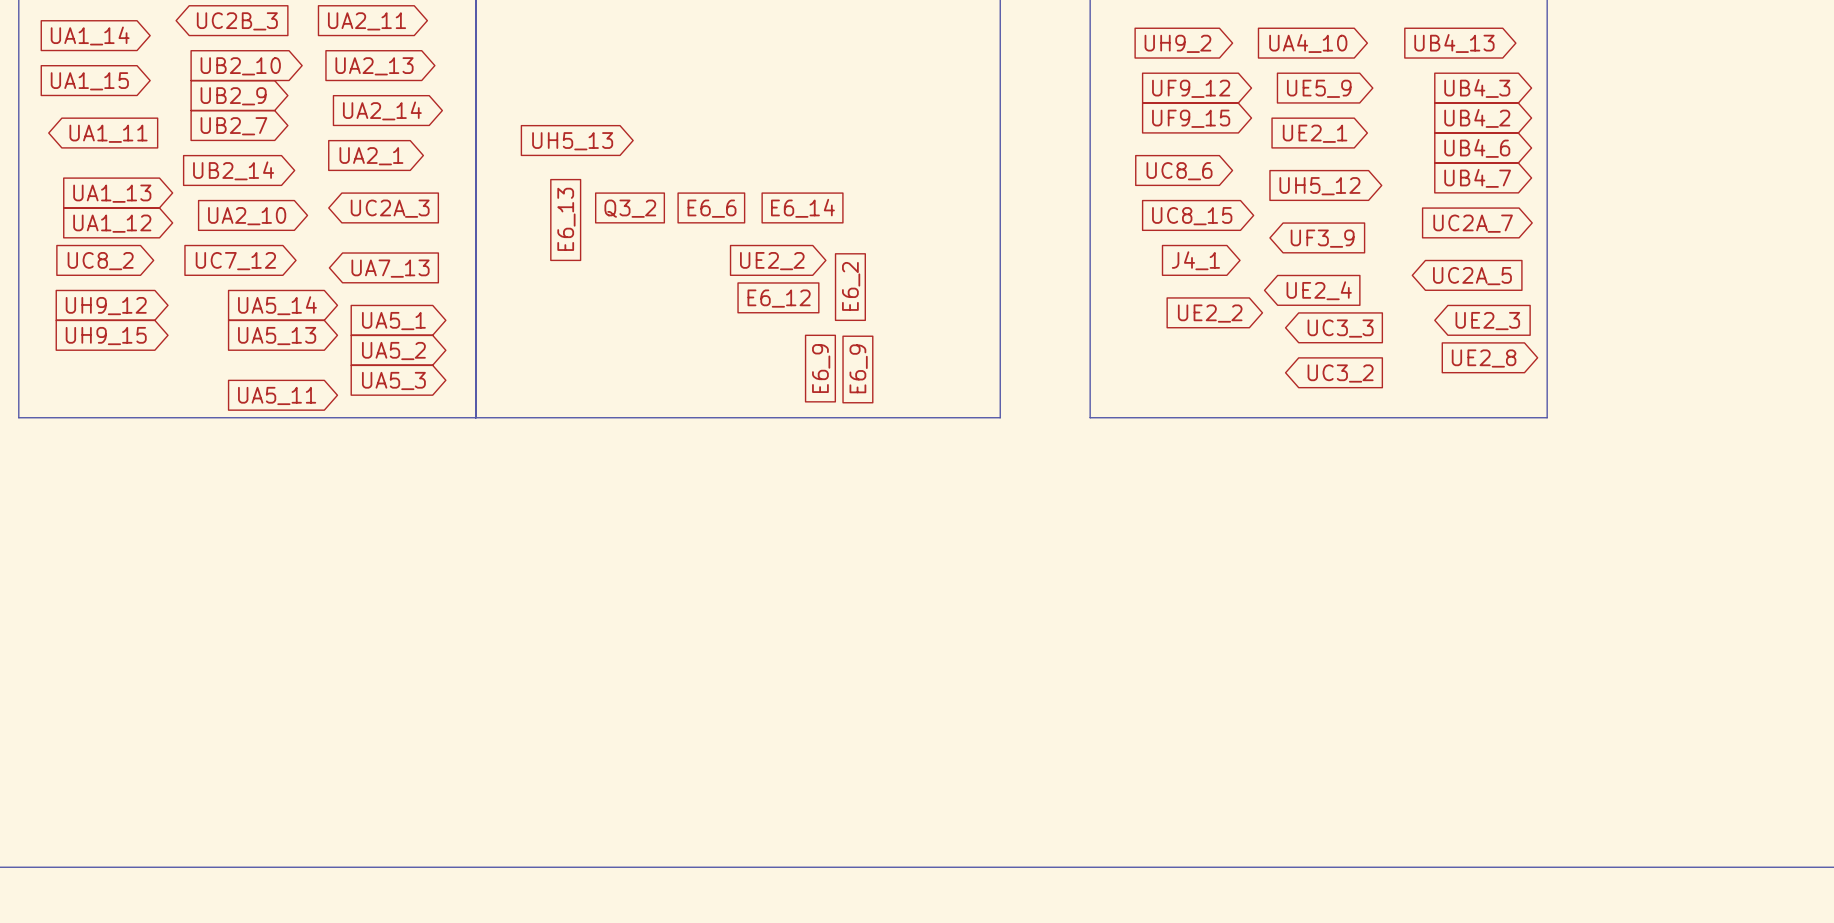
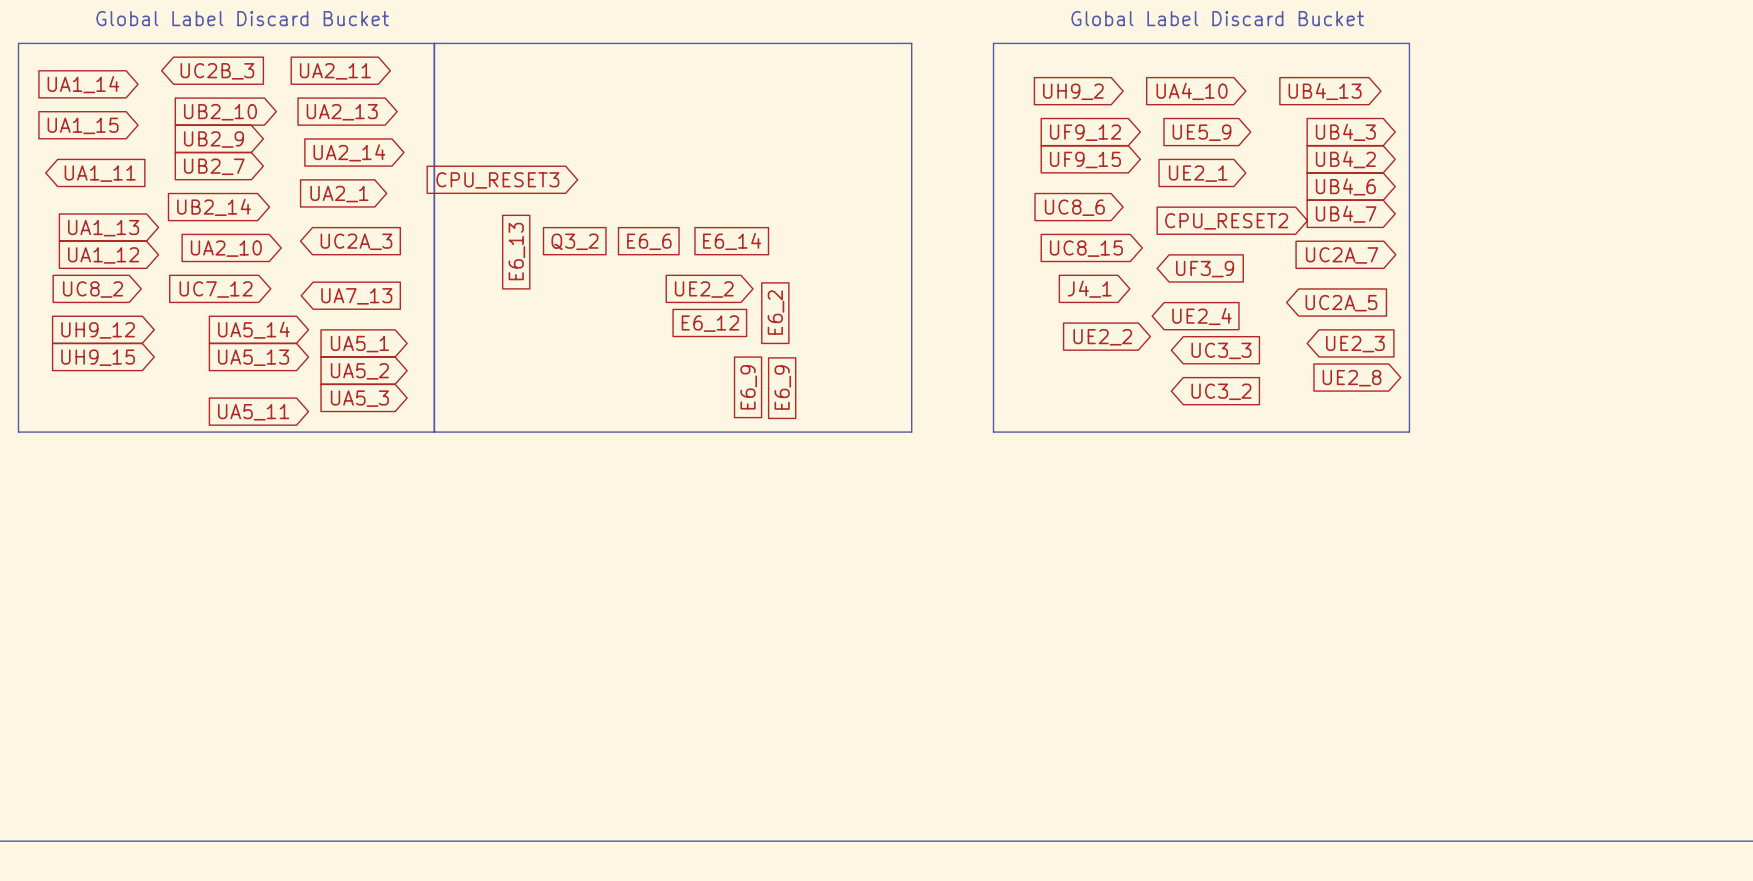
global label: UH5_13 (572, 141) -> CPU_RESET3 (497, 180)
global label: UH5_12 (1319, 186) -> CPU_RESET2 (1226, 221)

